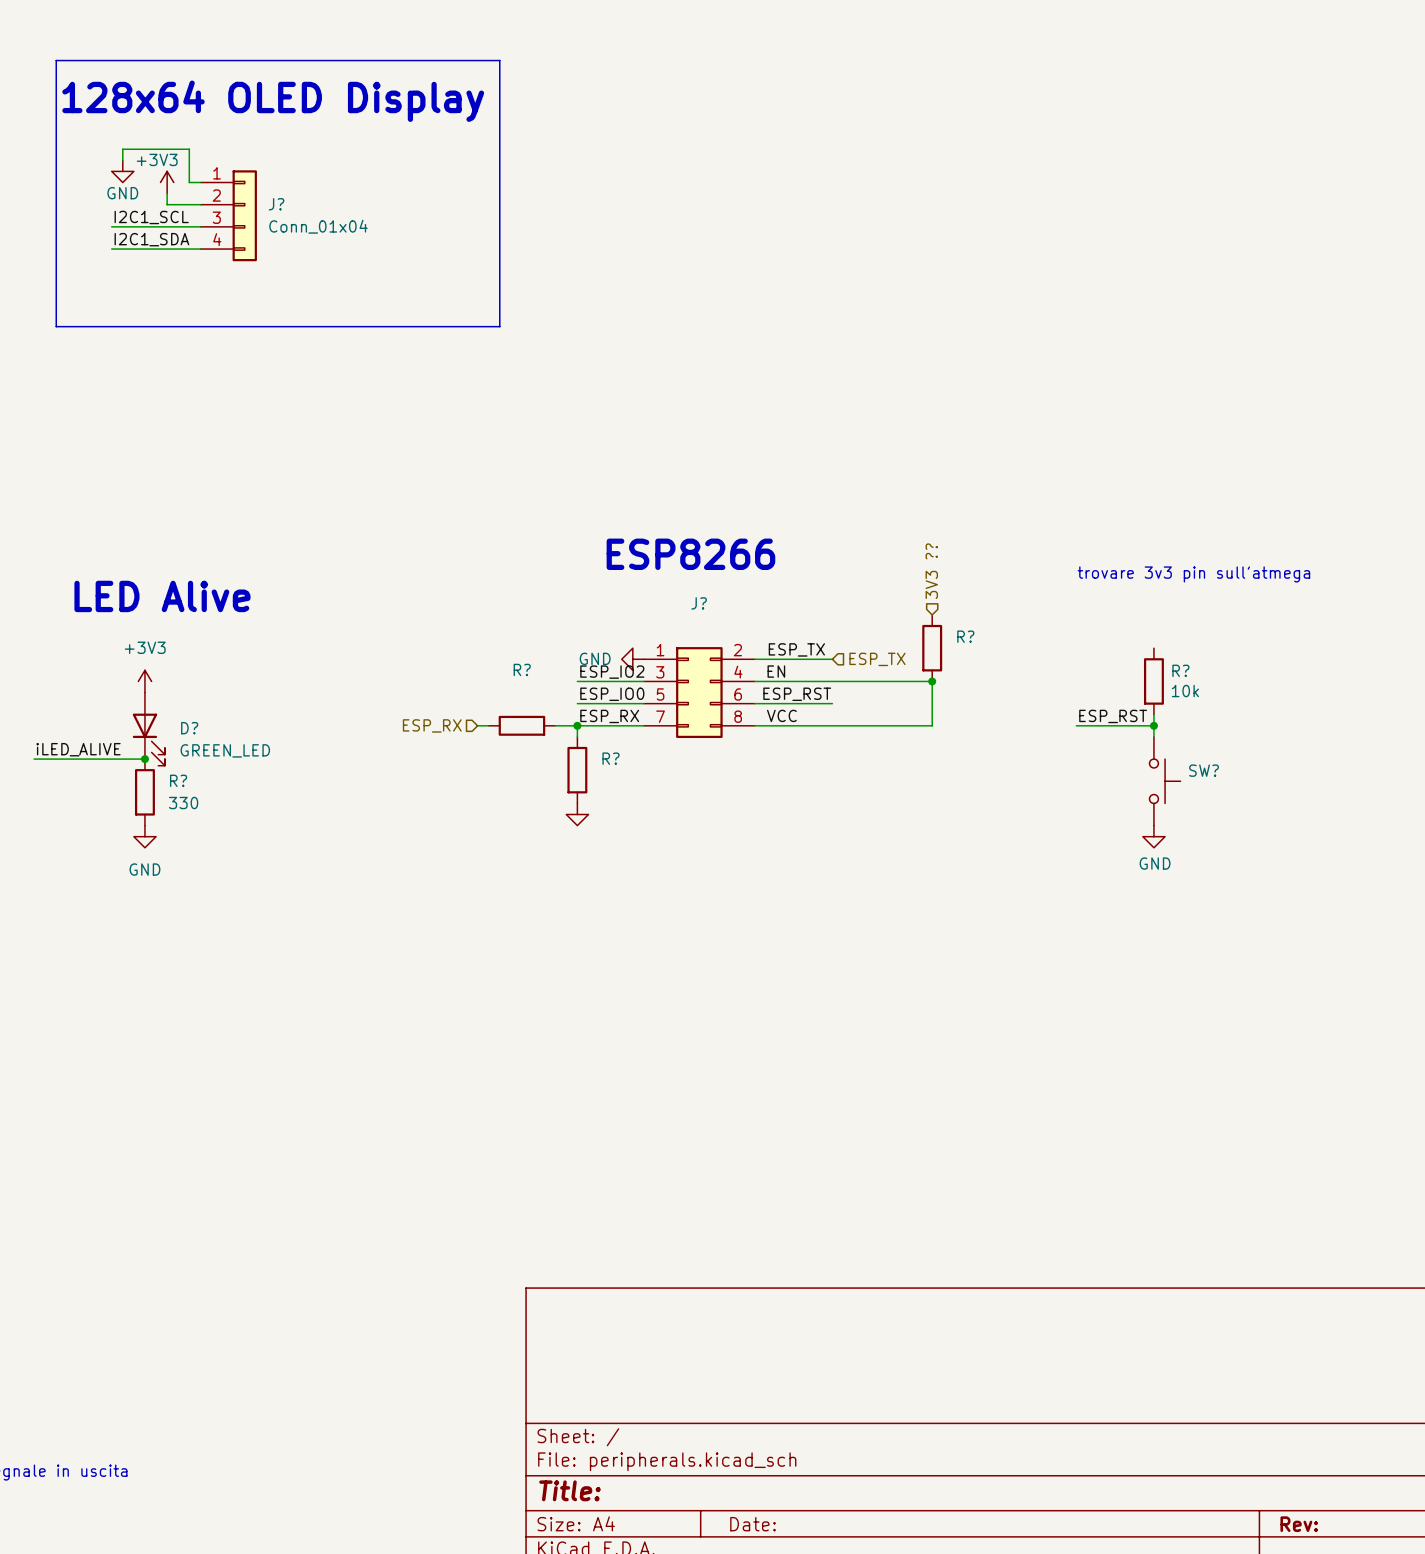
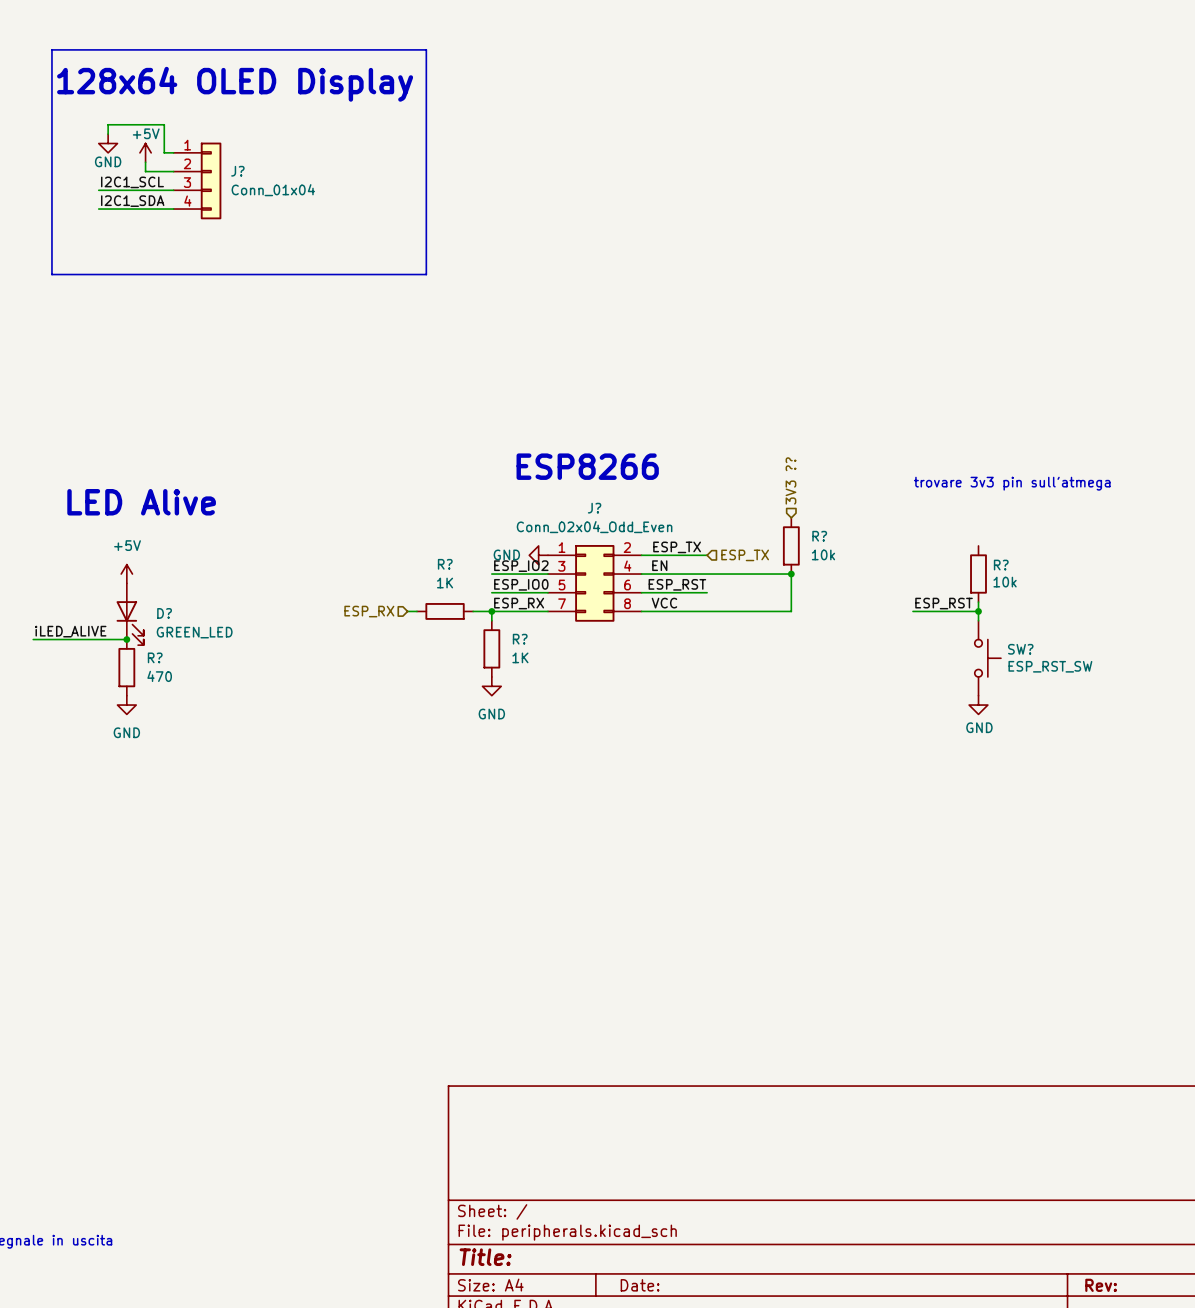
power symbol: +3V3 (167, 182) -> +5V (145, 152)
J? value: none -> Conn_02x04_Odd_Even (594, 527)
R? value: none -> 10k (823, 554)
power symbol: +3V3 (144, 681) -> +5V (126, 574)
R? value: none -> 1K (445, 583)
R? value: none -> 1K (520, 657)
SW? value: none -> ESP_RST_SW (1050, 666)
R? value: 330 (183, 803) -> 470 (159, 676)
power symbol text: none -> GND (491, 714)

